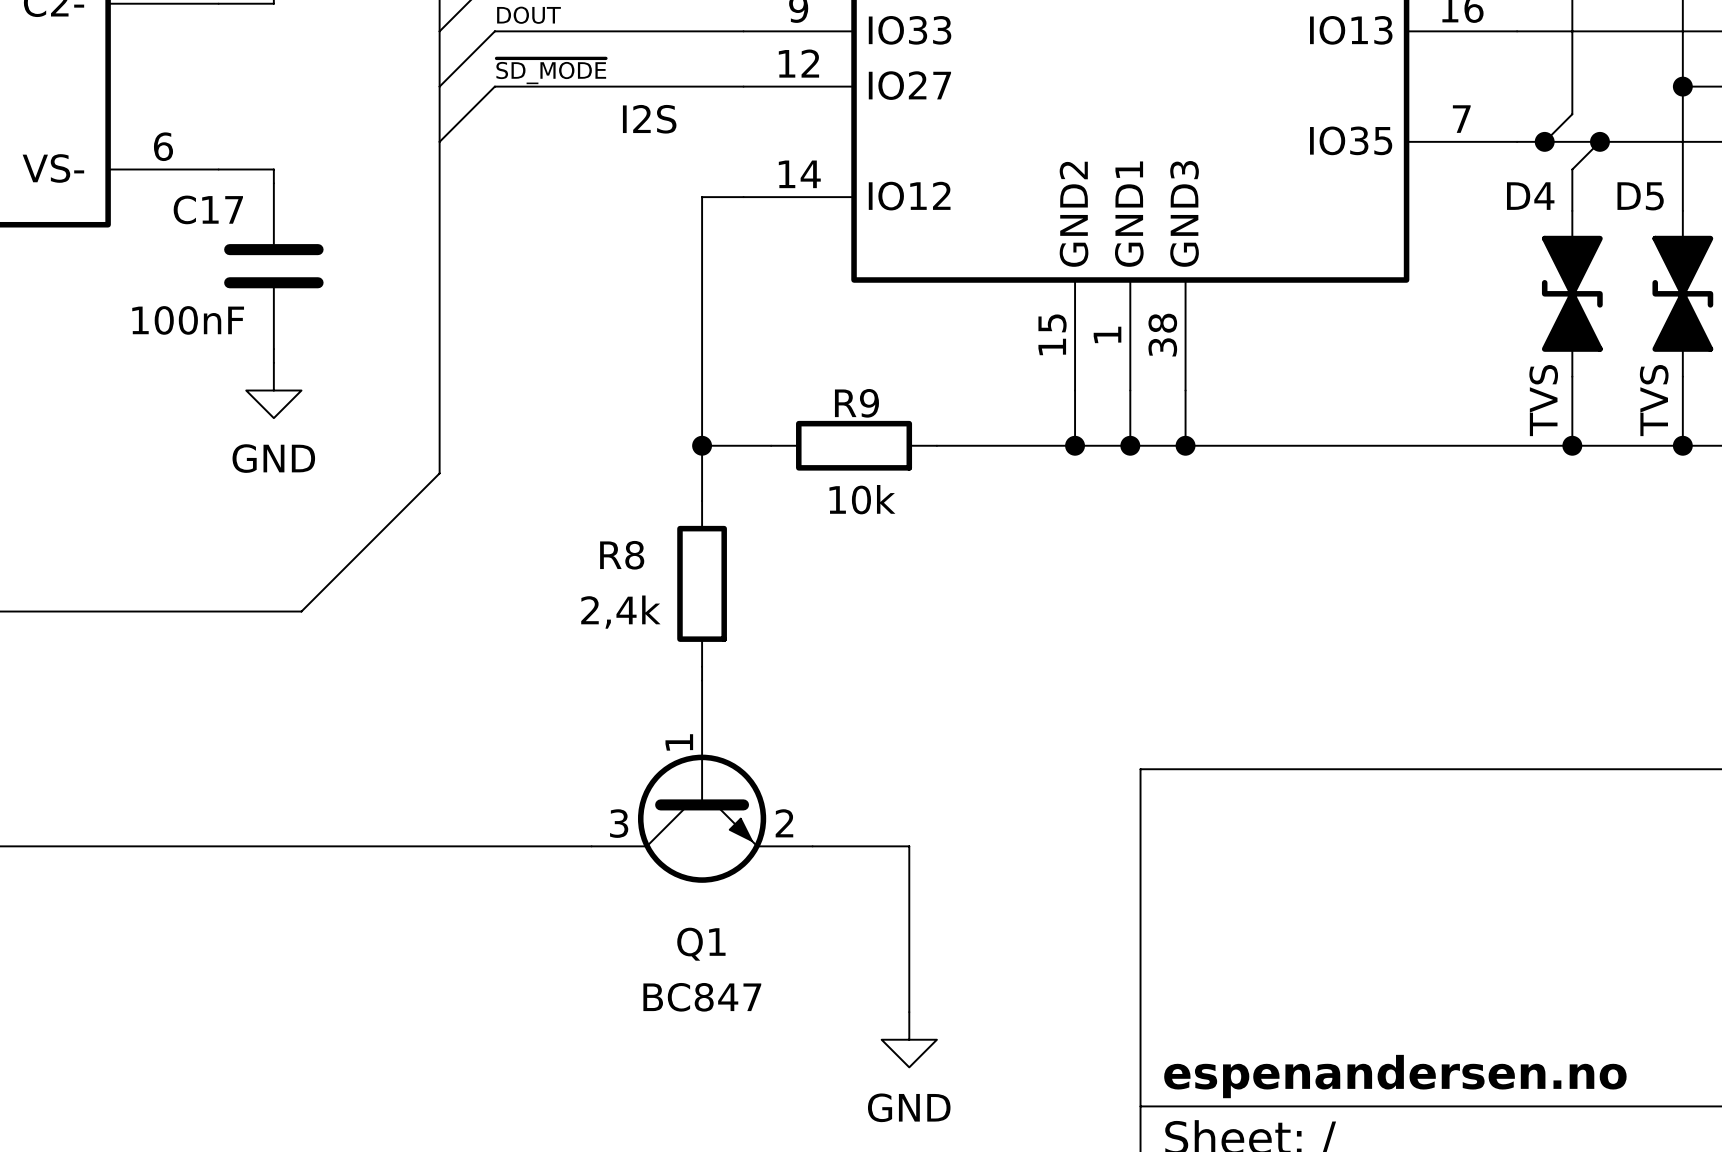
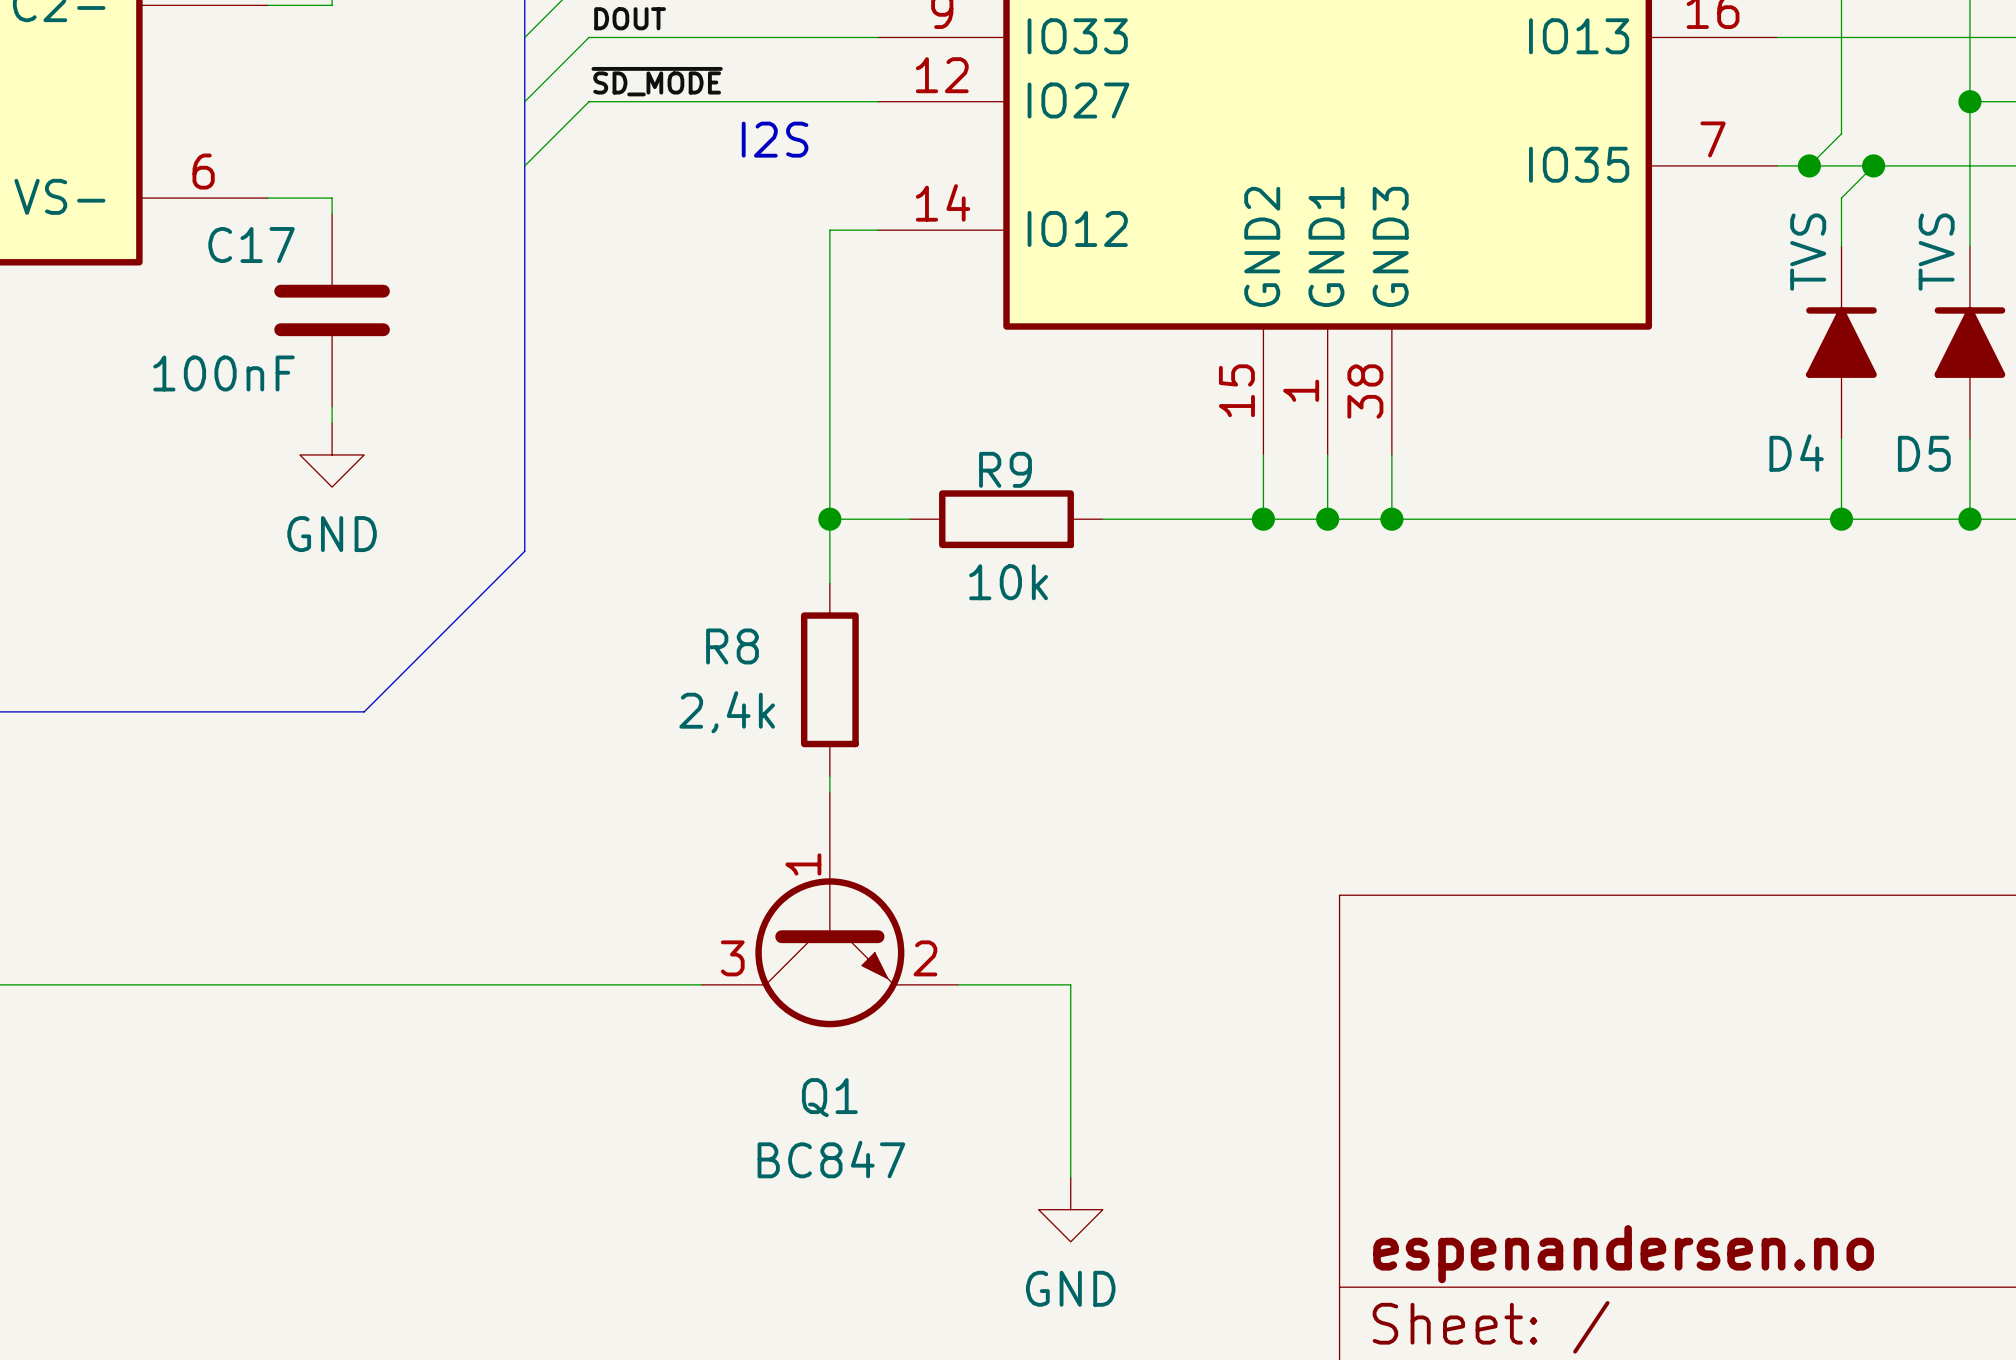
D4 name position: D4 (1530, 196) -> D4 (1796, 453)
D5 name position: D5 (1640, 196) -> D5 (1924, 453)
D4 symbol: [1541, 210, 1603, 377] -> [1806, 246, 1877, 439]
D5 symbol: [1652, 210, 1714, 377] -> [1934, 246, 2006, 439]
D4 value position: TVS (1543, 400) -> TVS (1808, 252)
D5 value position: TVS (1654, 400) -> TVS (1936, 252)

